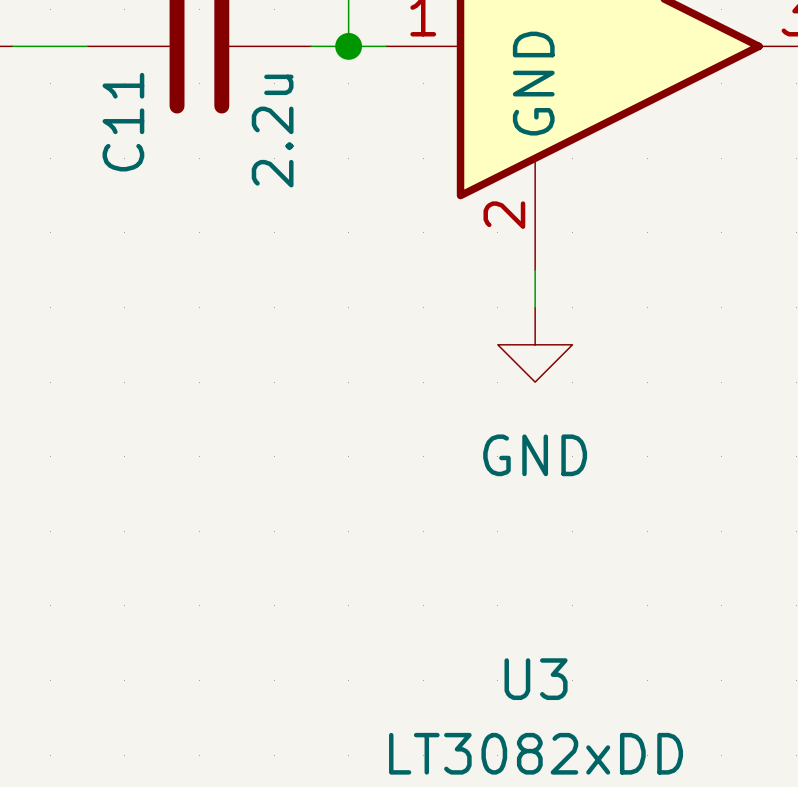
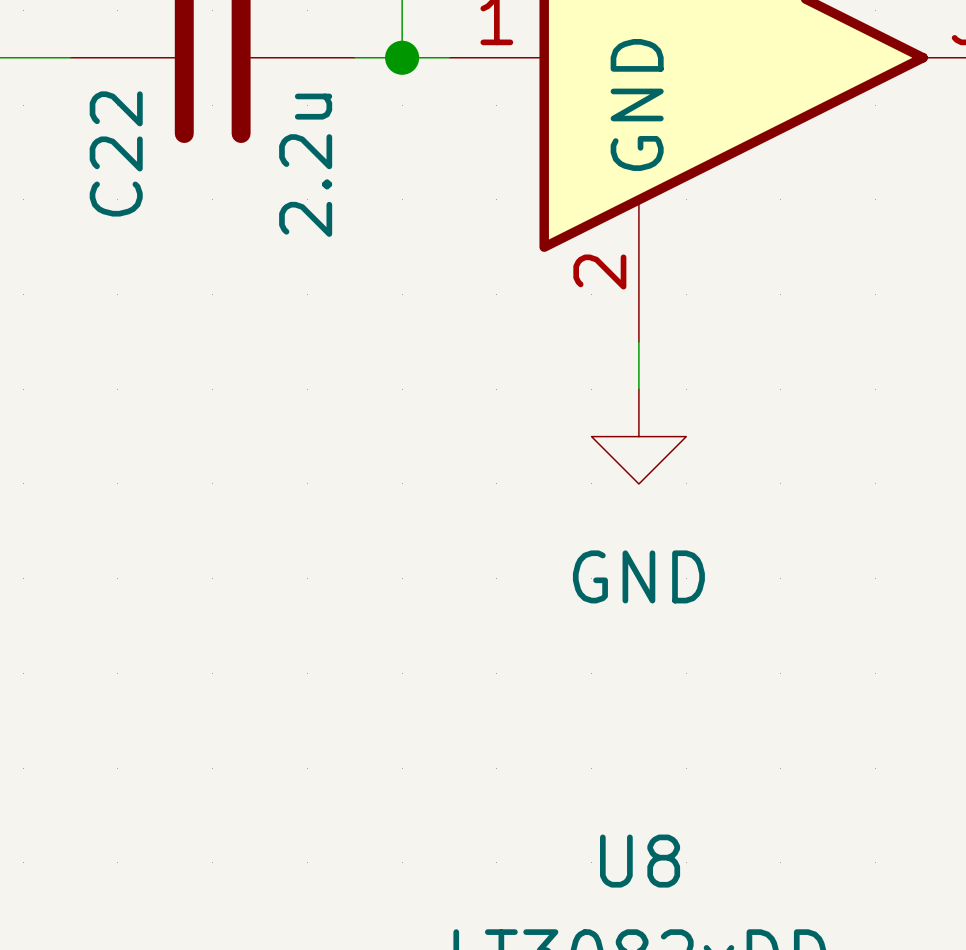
C11 name: C11 (123, 122) -> C22 (116, 153)
U3 name: U3 (536, 679) -> U8 (640, 861)

